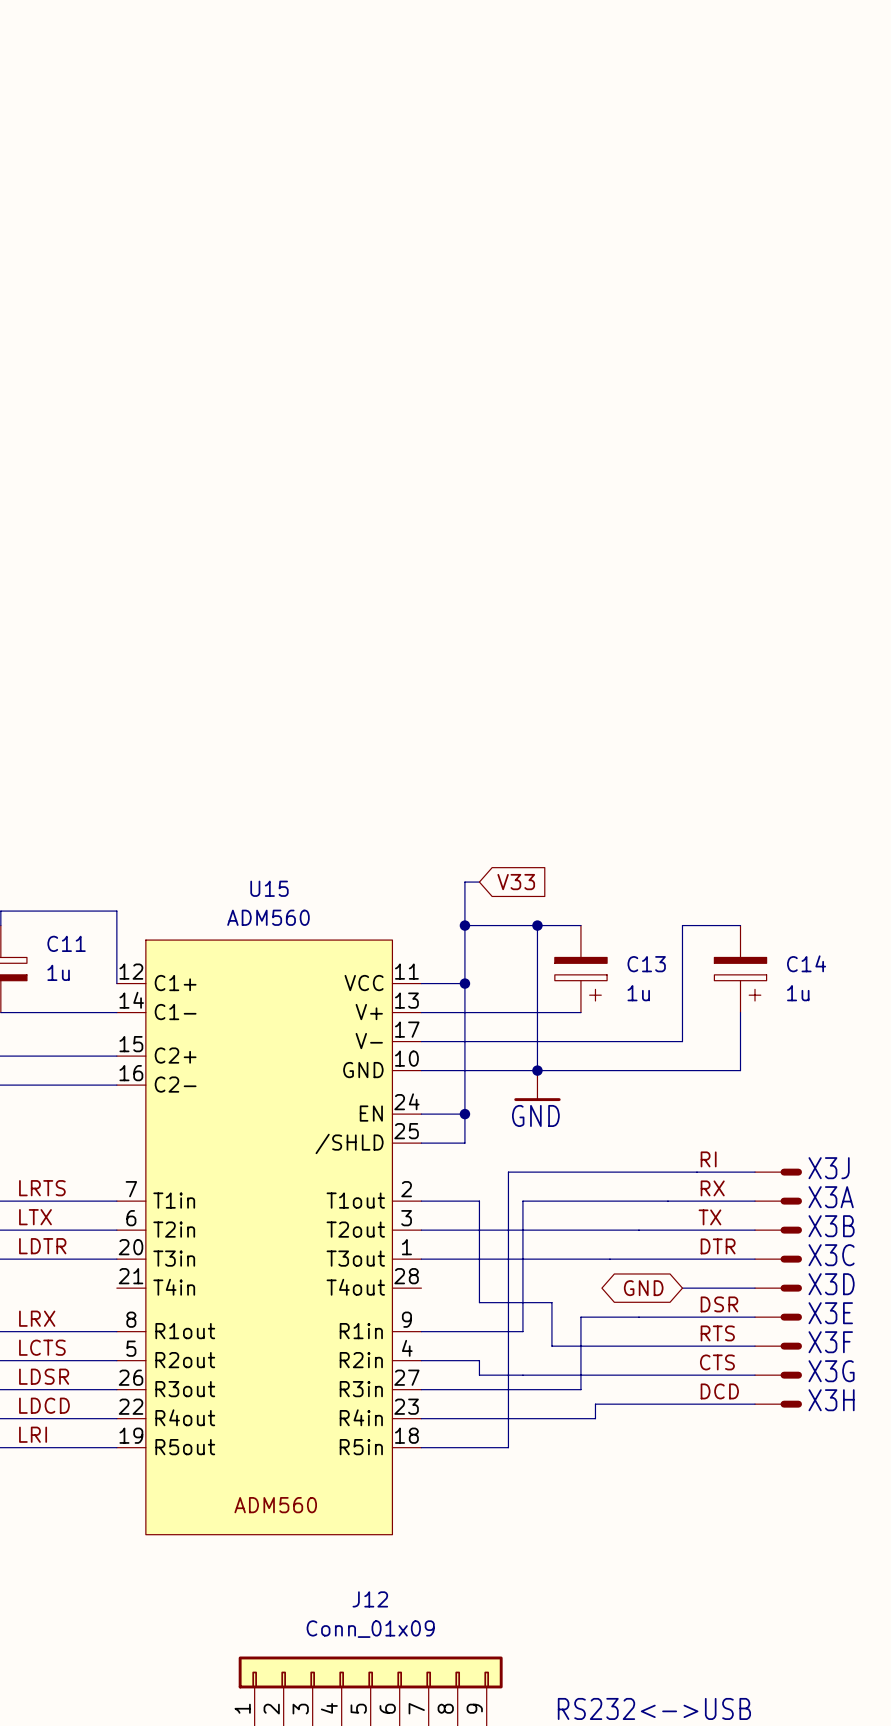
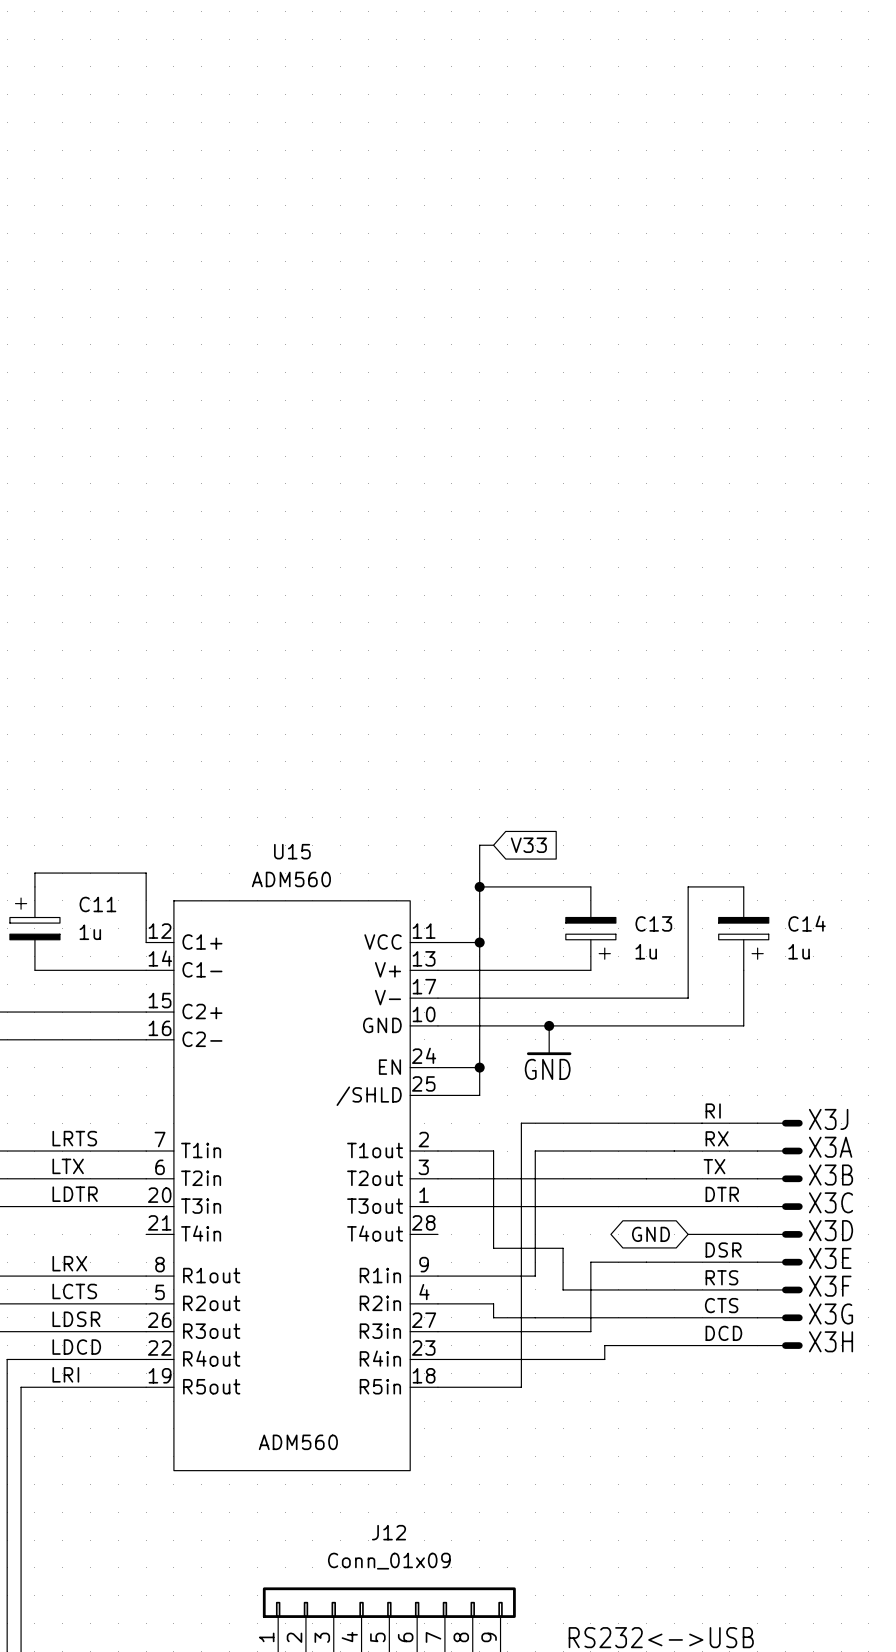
wire: (537, 925) (537, 1070) -> none
junction: (537, 925) -> none

